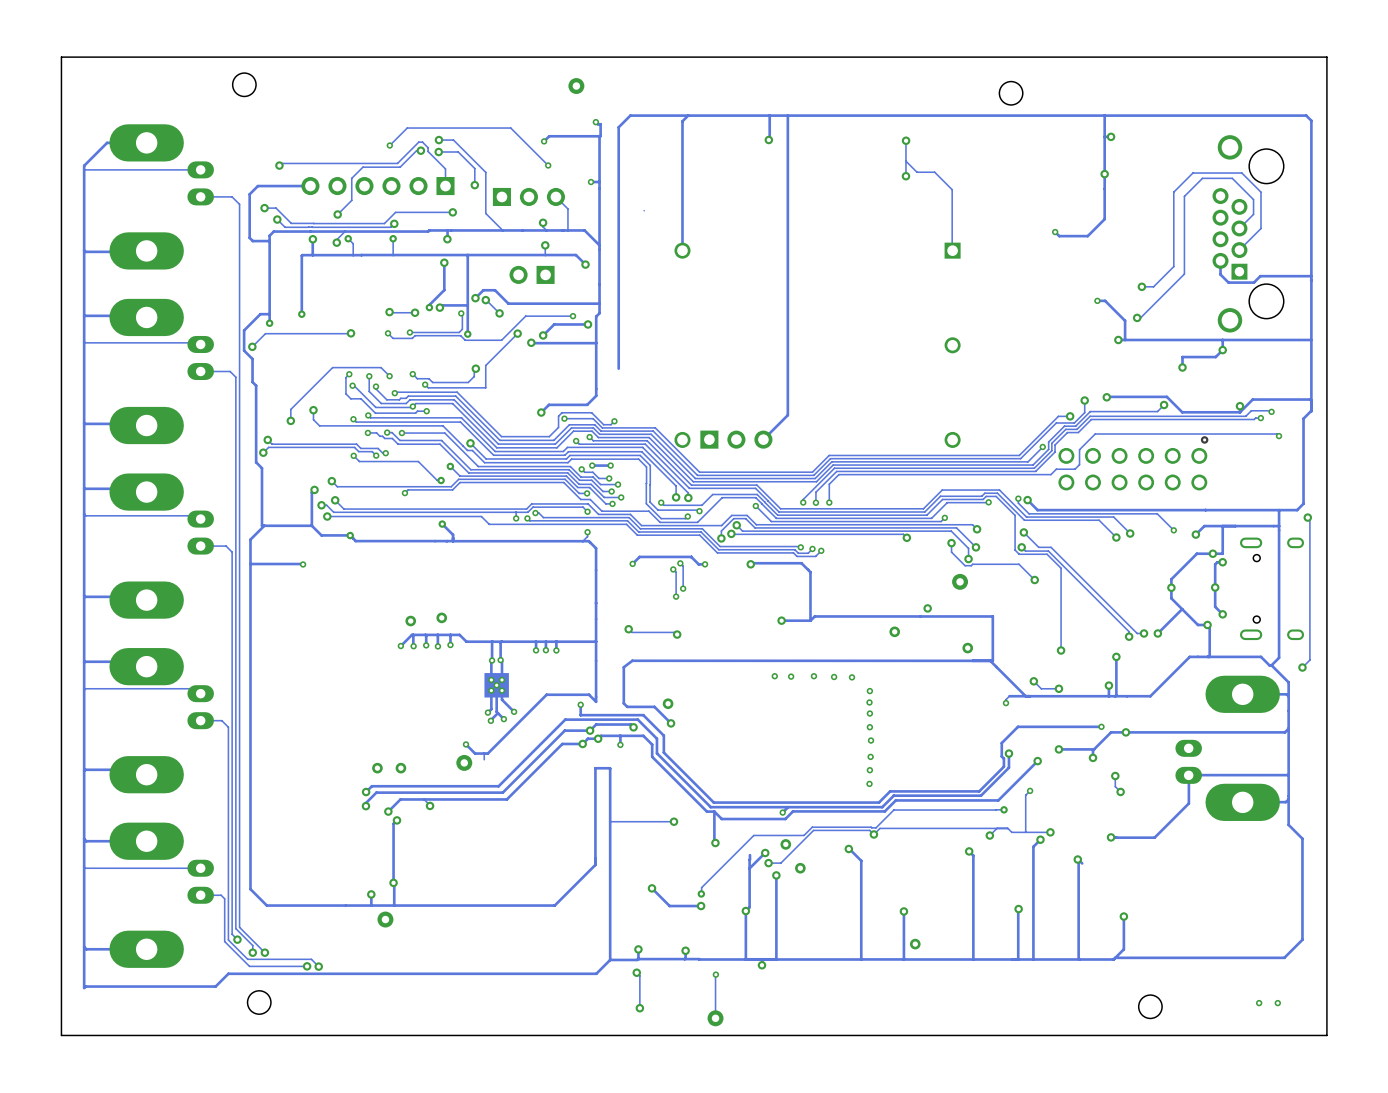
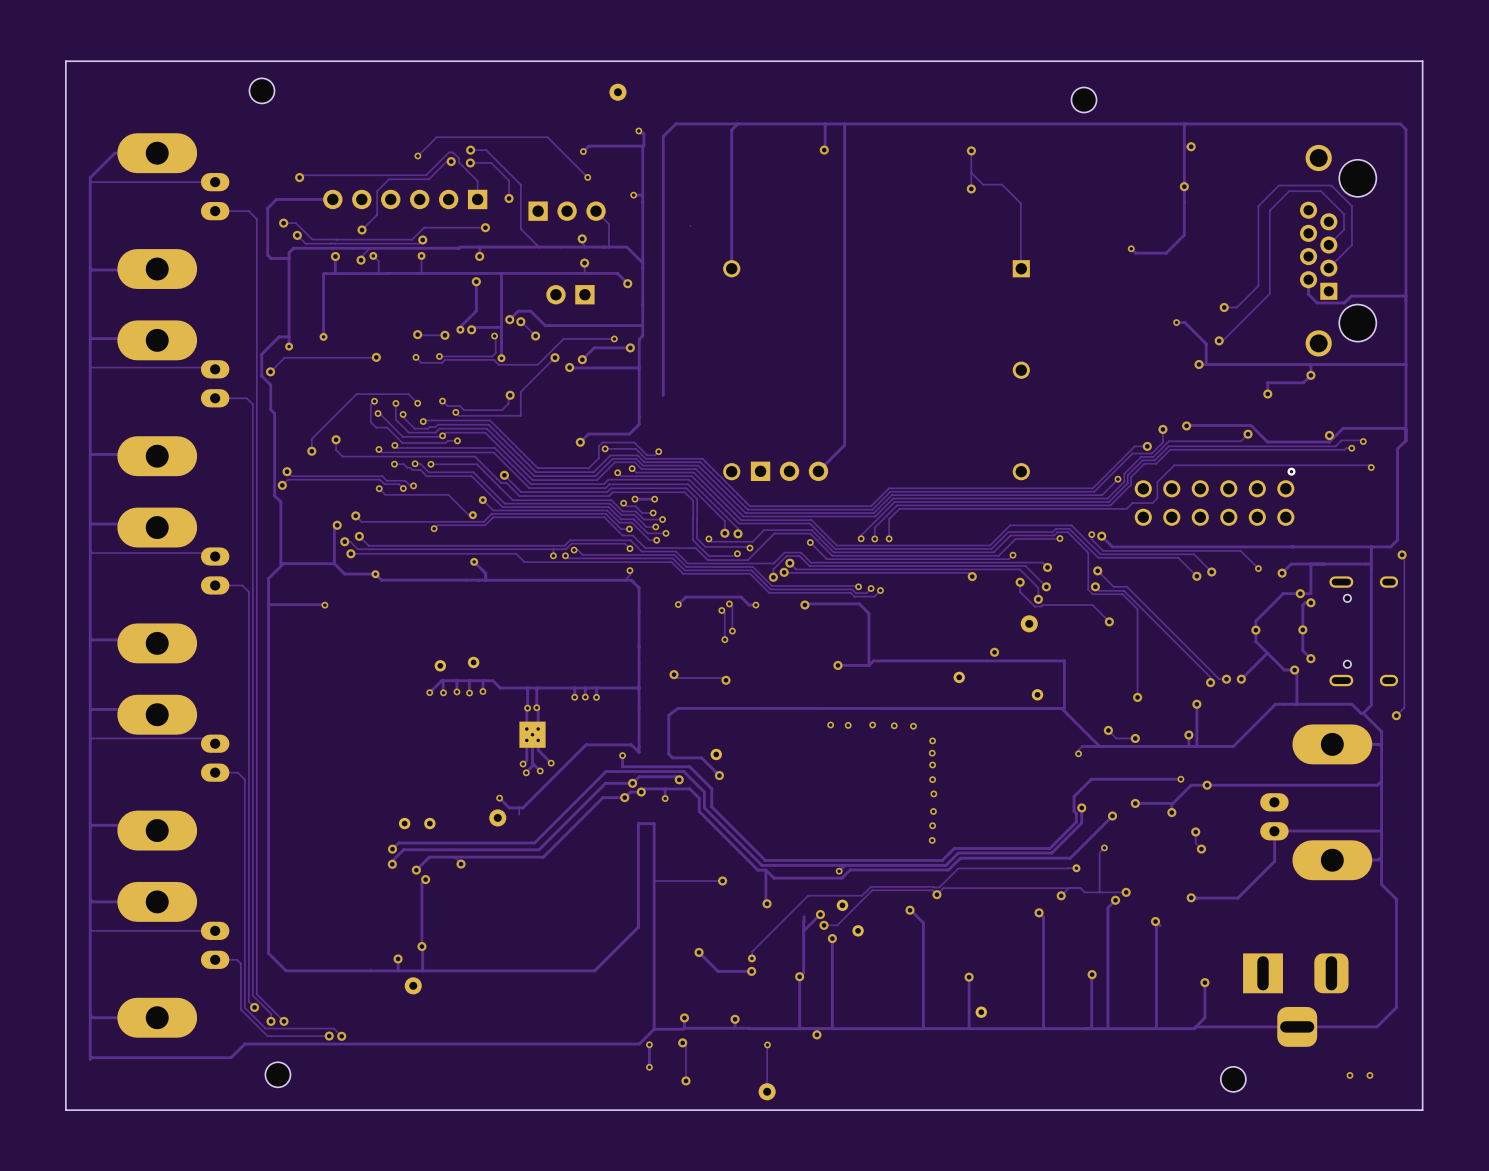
part: none -> (1295, 1000)
track: none -> (649, 1044) (649, 1067)
via: none -> (649, 1044)
via: none -> (649, 1067)

